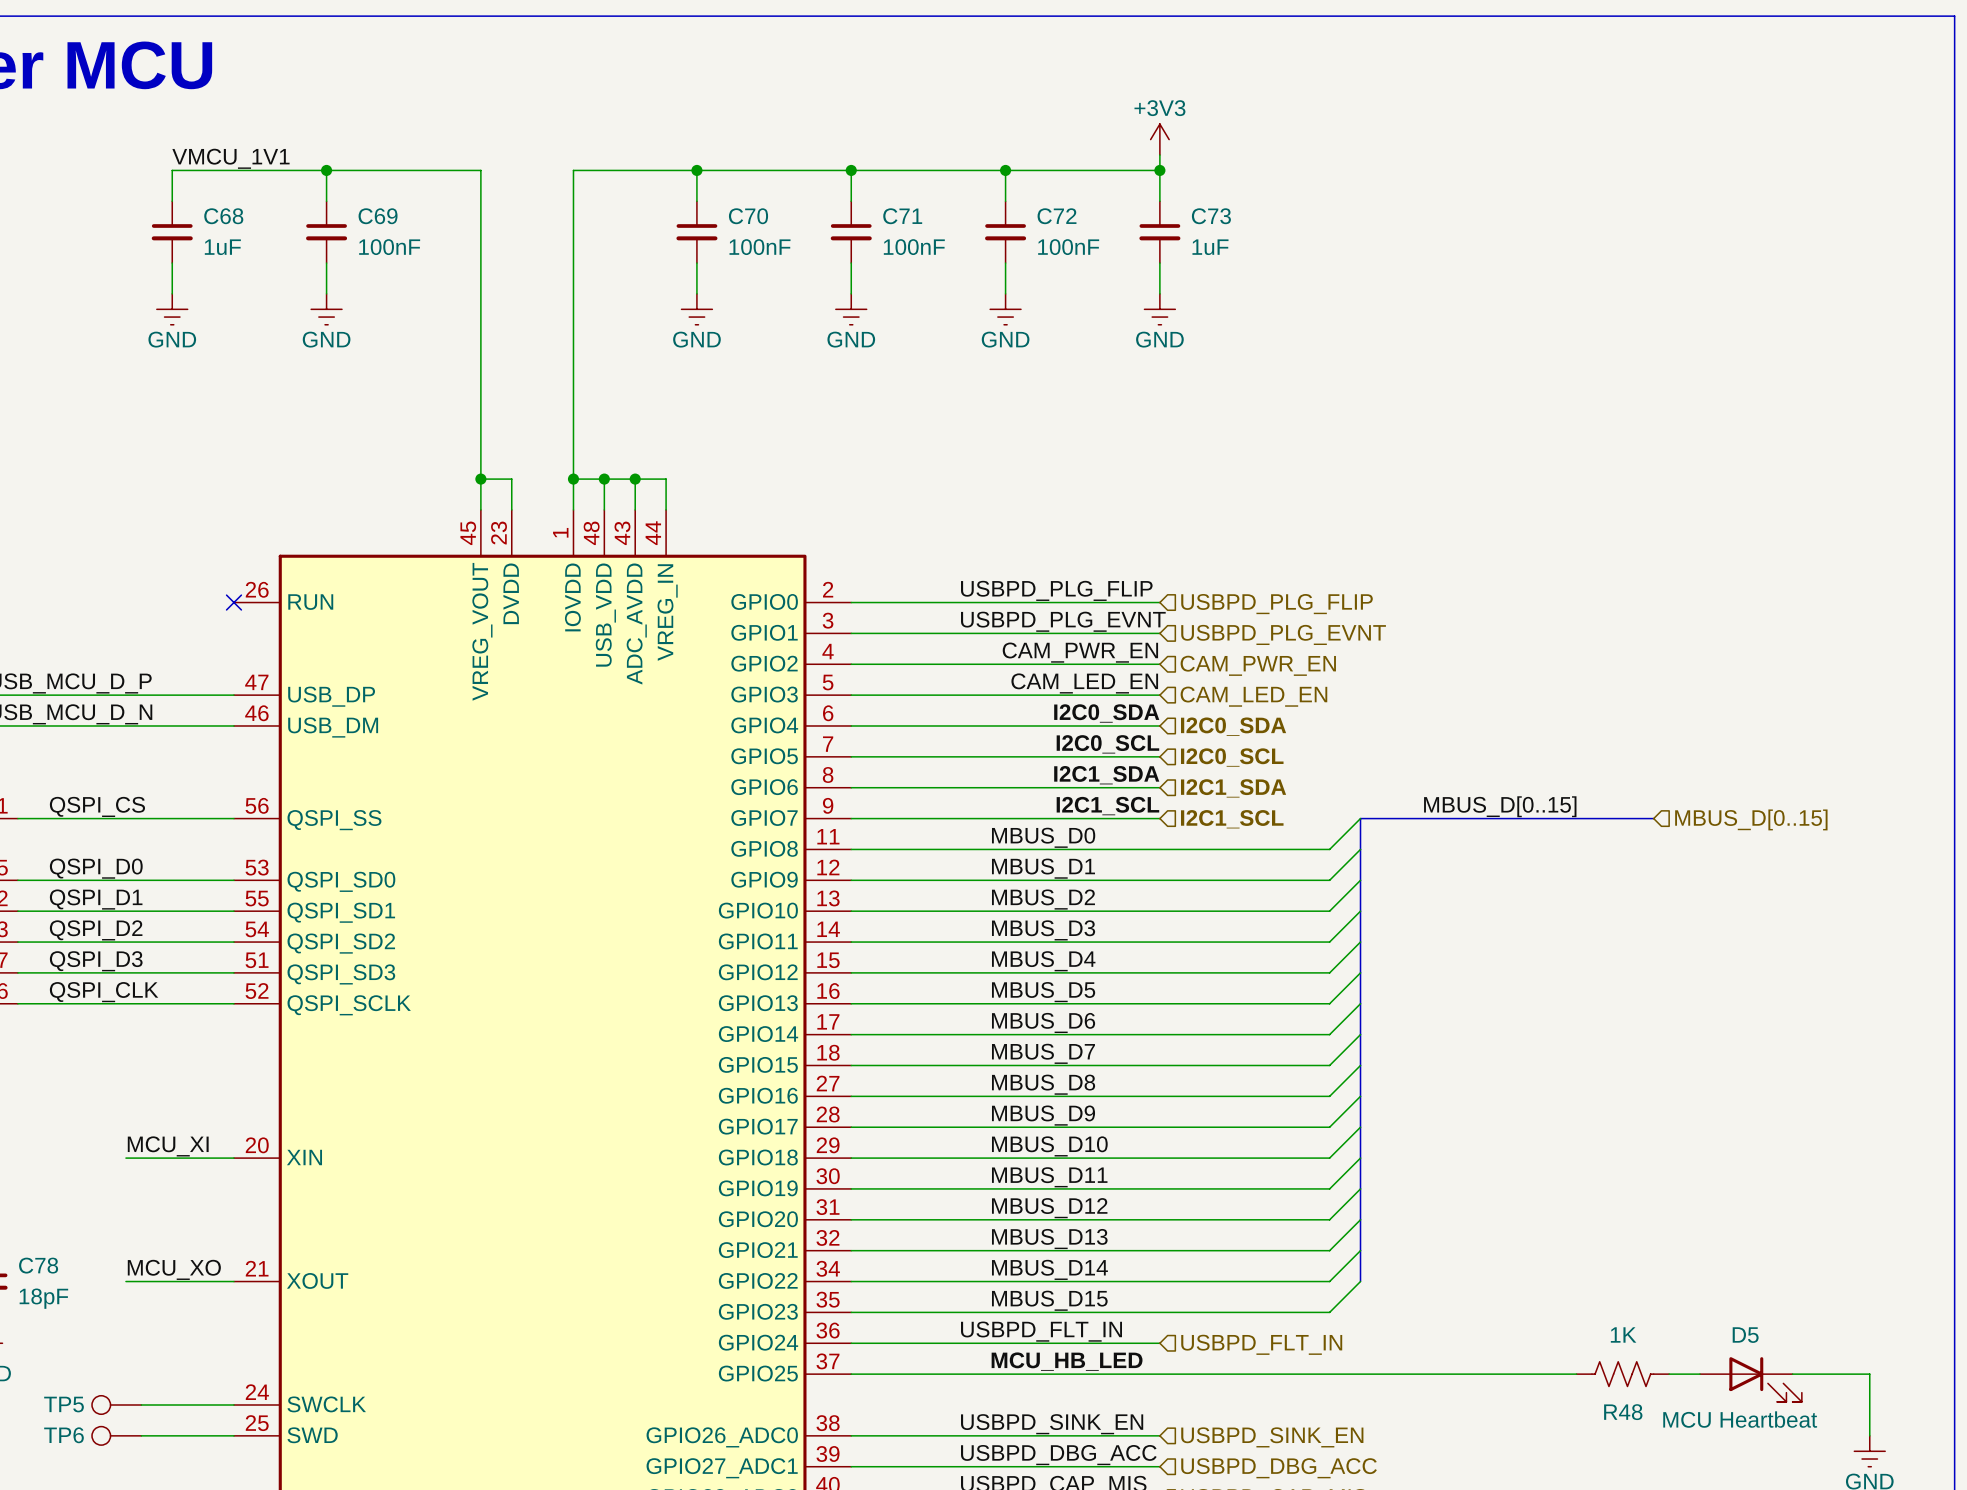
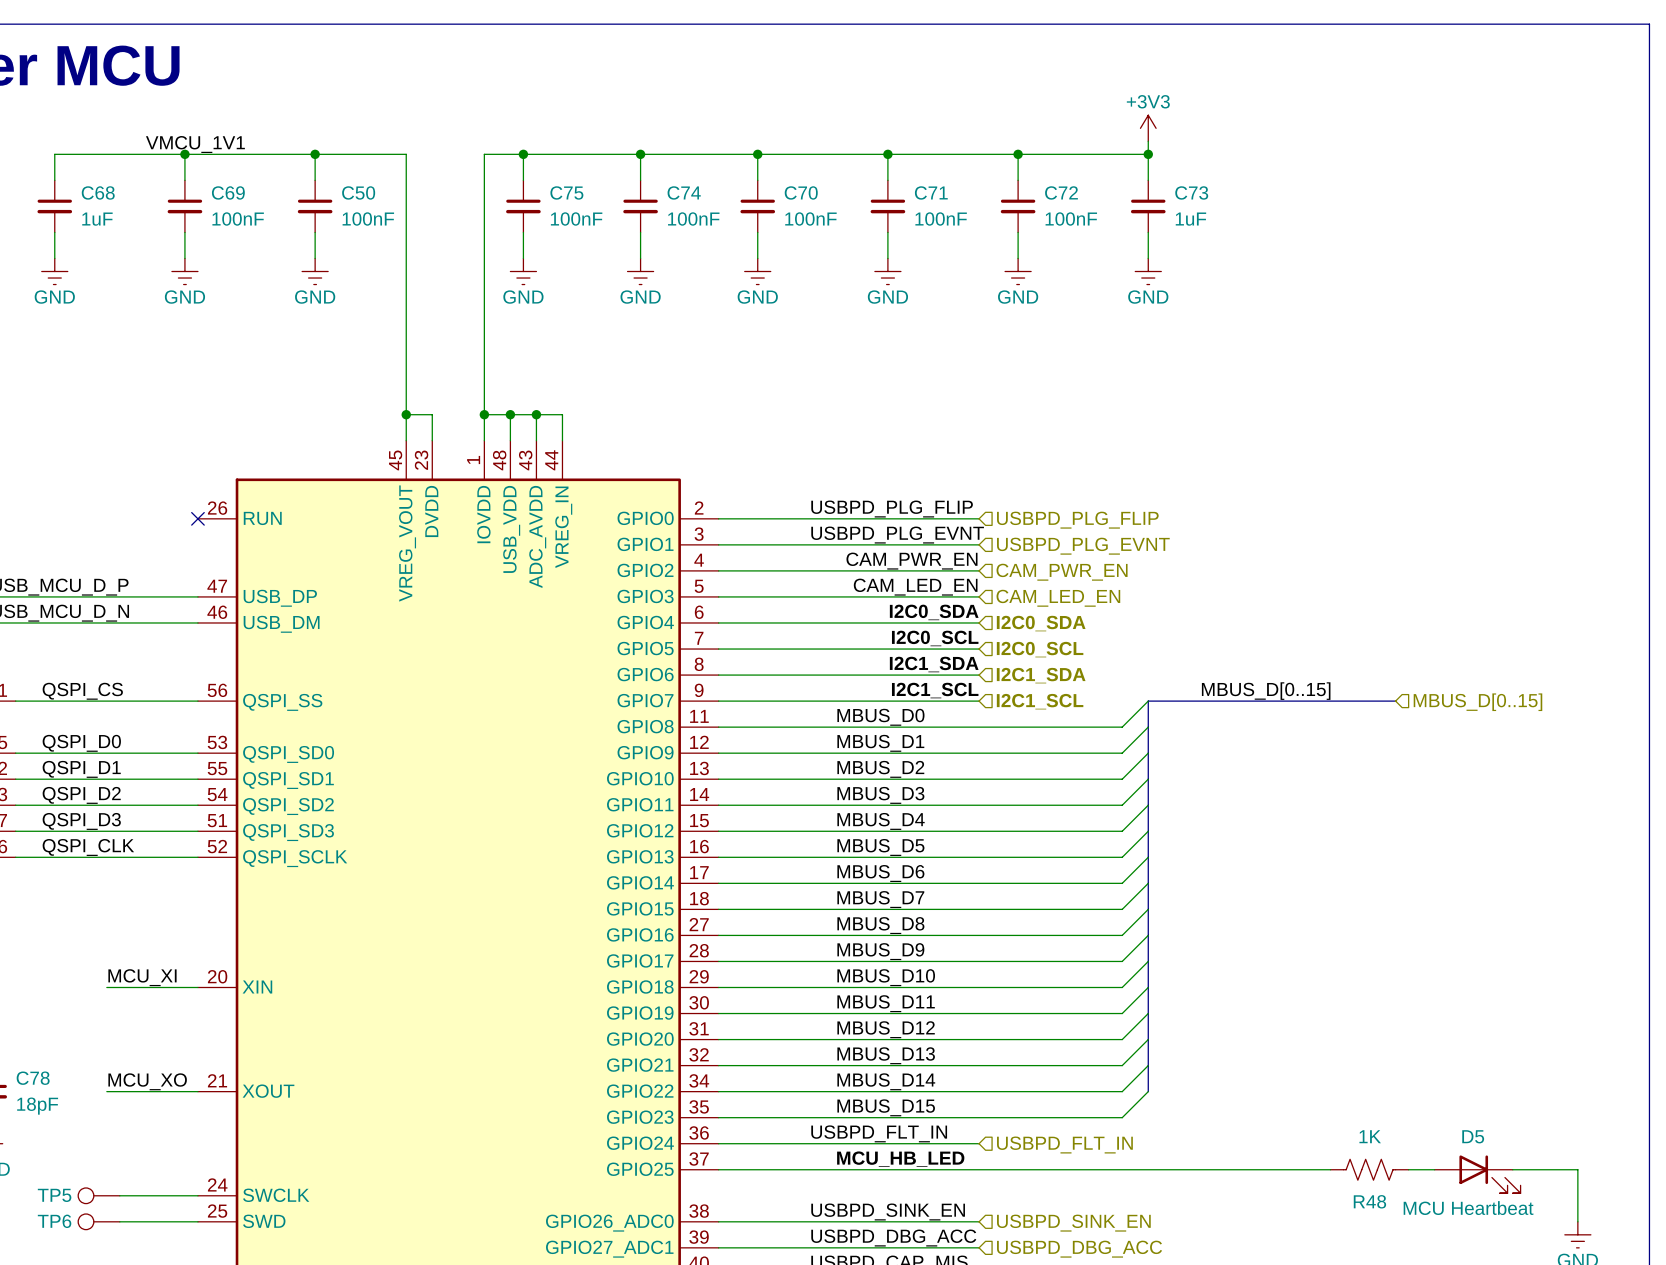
power symbol position: +3V3 (1159, 139) -> +3V3 (1148, 128)
wire: (1159, 155) (1159, 201) -> (1148, 141) (1148, 180)
wire: (172, 170) (172, 201) -> (145, 154) (54, 154) (54, 180)
wire: none -> (184, 154) (184, 180)
junction: none -> (184, 154)
wire: (326, 170) (326, 201) -> (315, 154) (315, 180)
junction position: (326, 170) -> (315, 154)
wire: none -> (523, 154) (523, 180)
junction: none -> (523, 154)
wire: (696, 170) (696, 201) -> (757, 154) (757, 180)
junction: (696, 170) -> none
wire: none -> (640, 154) (640, 180)
junction: none -> (640, 154)
wire: (851, 170) (851, 201) -> (887, 154) (887, 180)
junction: (851, 170) -> none
junction: none -> (757, 154)
wire: (1005, 170) (1005, 201) -> (1018, 154) (1018, 180)
junction position: (1005, 170) -> (887, 154)
wire: none -> (979, 154) (1148, 154)
junction position: (1159, 170) -> (1018, 154)
junction: none -> (1148, 154)
C68 position: (172, 232) -> (54, 206)
C69 position: (326, 232) -> (184, 206)
C50: none -> 100nF (315, 206)
C75: none -> 100nF (523, 206)
C70 position: (696, 232) -> (757, 206)
C74: none -> 100nF (640, 206)
C71 position: (851, 232) -> (887, 206)
C72 position: (1005, 232) -> (1018, 206)
C73 position: (1159, 232) -> (1148, 206)
wire: none -> (54, 232) (54, 258)
wire: (172, 263) (172, 293) -> (315, 232) (315, 258)
wire: (326, 263) (326, 293) -> (184, 232) (184, 258)
wire: none -> (523, 232) (523, 258)
wire: (696, 263) (696, 293) -> (757, 232) (757, 258)
wire: none -> (640, 232) (640, 258)
wire: (851, 263) (851, 293) -> (887, 232) (887, 258)
wire: (1005, 263) (1005, 293) -> (1018, 232) (1018, 258)
wire: (1159, 263) (1159, 293) -> (1148, 232) (1148, 258)
power symbol: none -> GND (54, 271)
power symbol position: GND (172, 309) -> GND (184, 271)
power symbol position: GND (326, 309) -> GND (315, 271)
power symbol: none -> GND (523, 271)
power symbol: GND (696, 309) -> none
power symbol: none -> GND (640, 271)
power symbol: GND (851, 309) -> none
power symbol: none -> GND (757, 271)
power symbol position: GND (1005, 309) -> GND (887, 271)
power symbol position: GND (1159, 309) -> GND (1018, 271)
power symbol: none -> GND (1148, 271)

